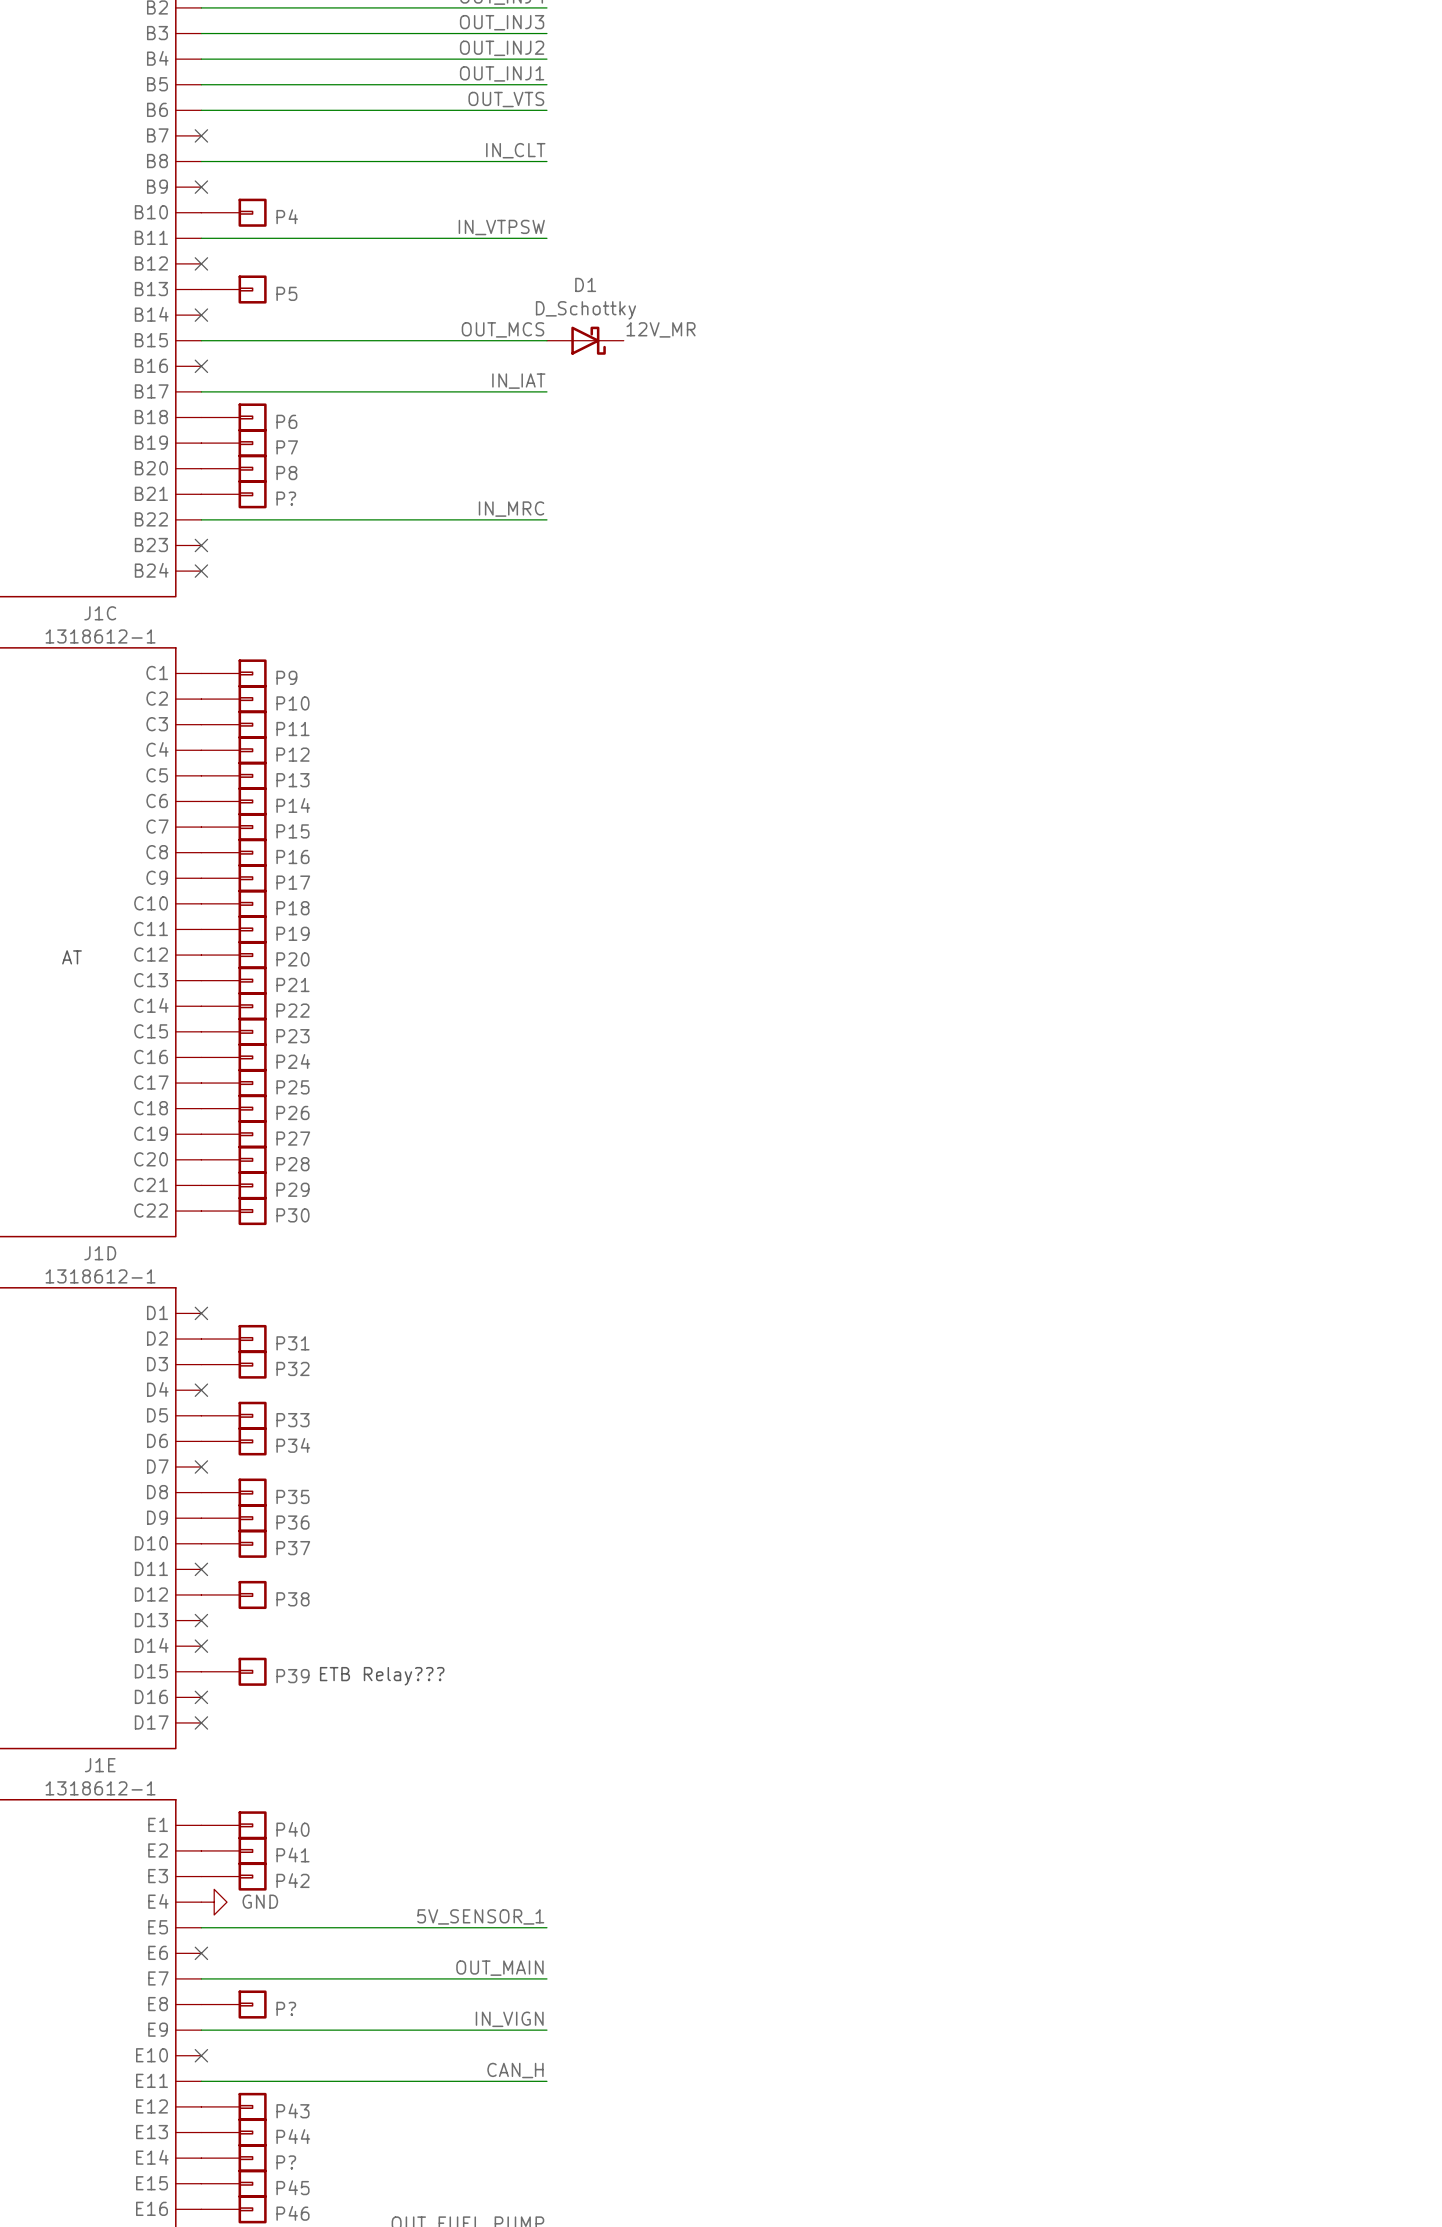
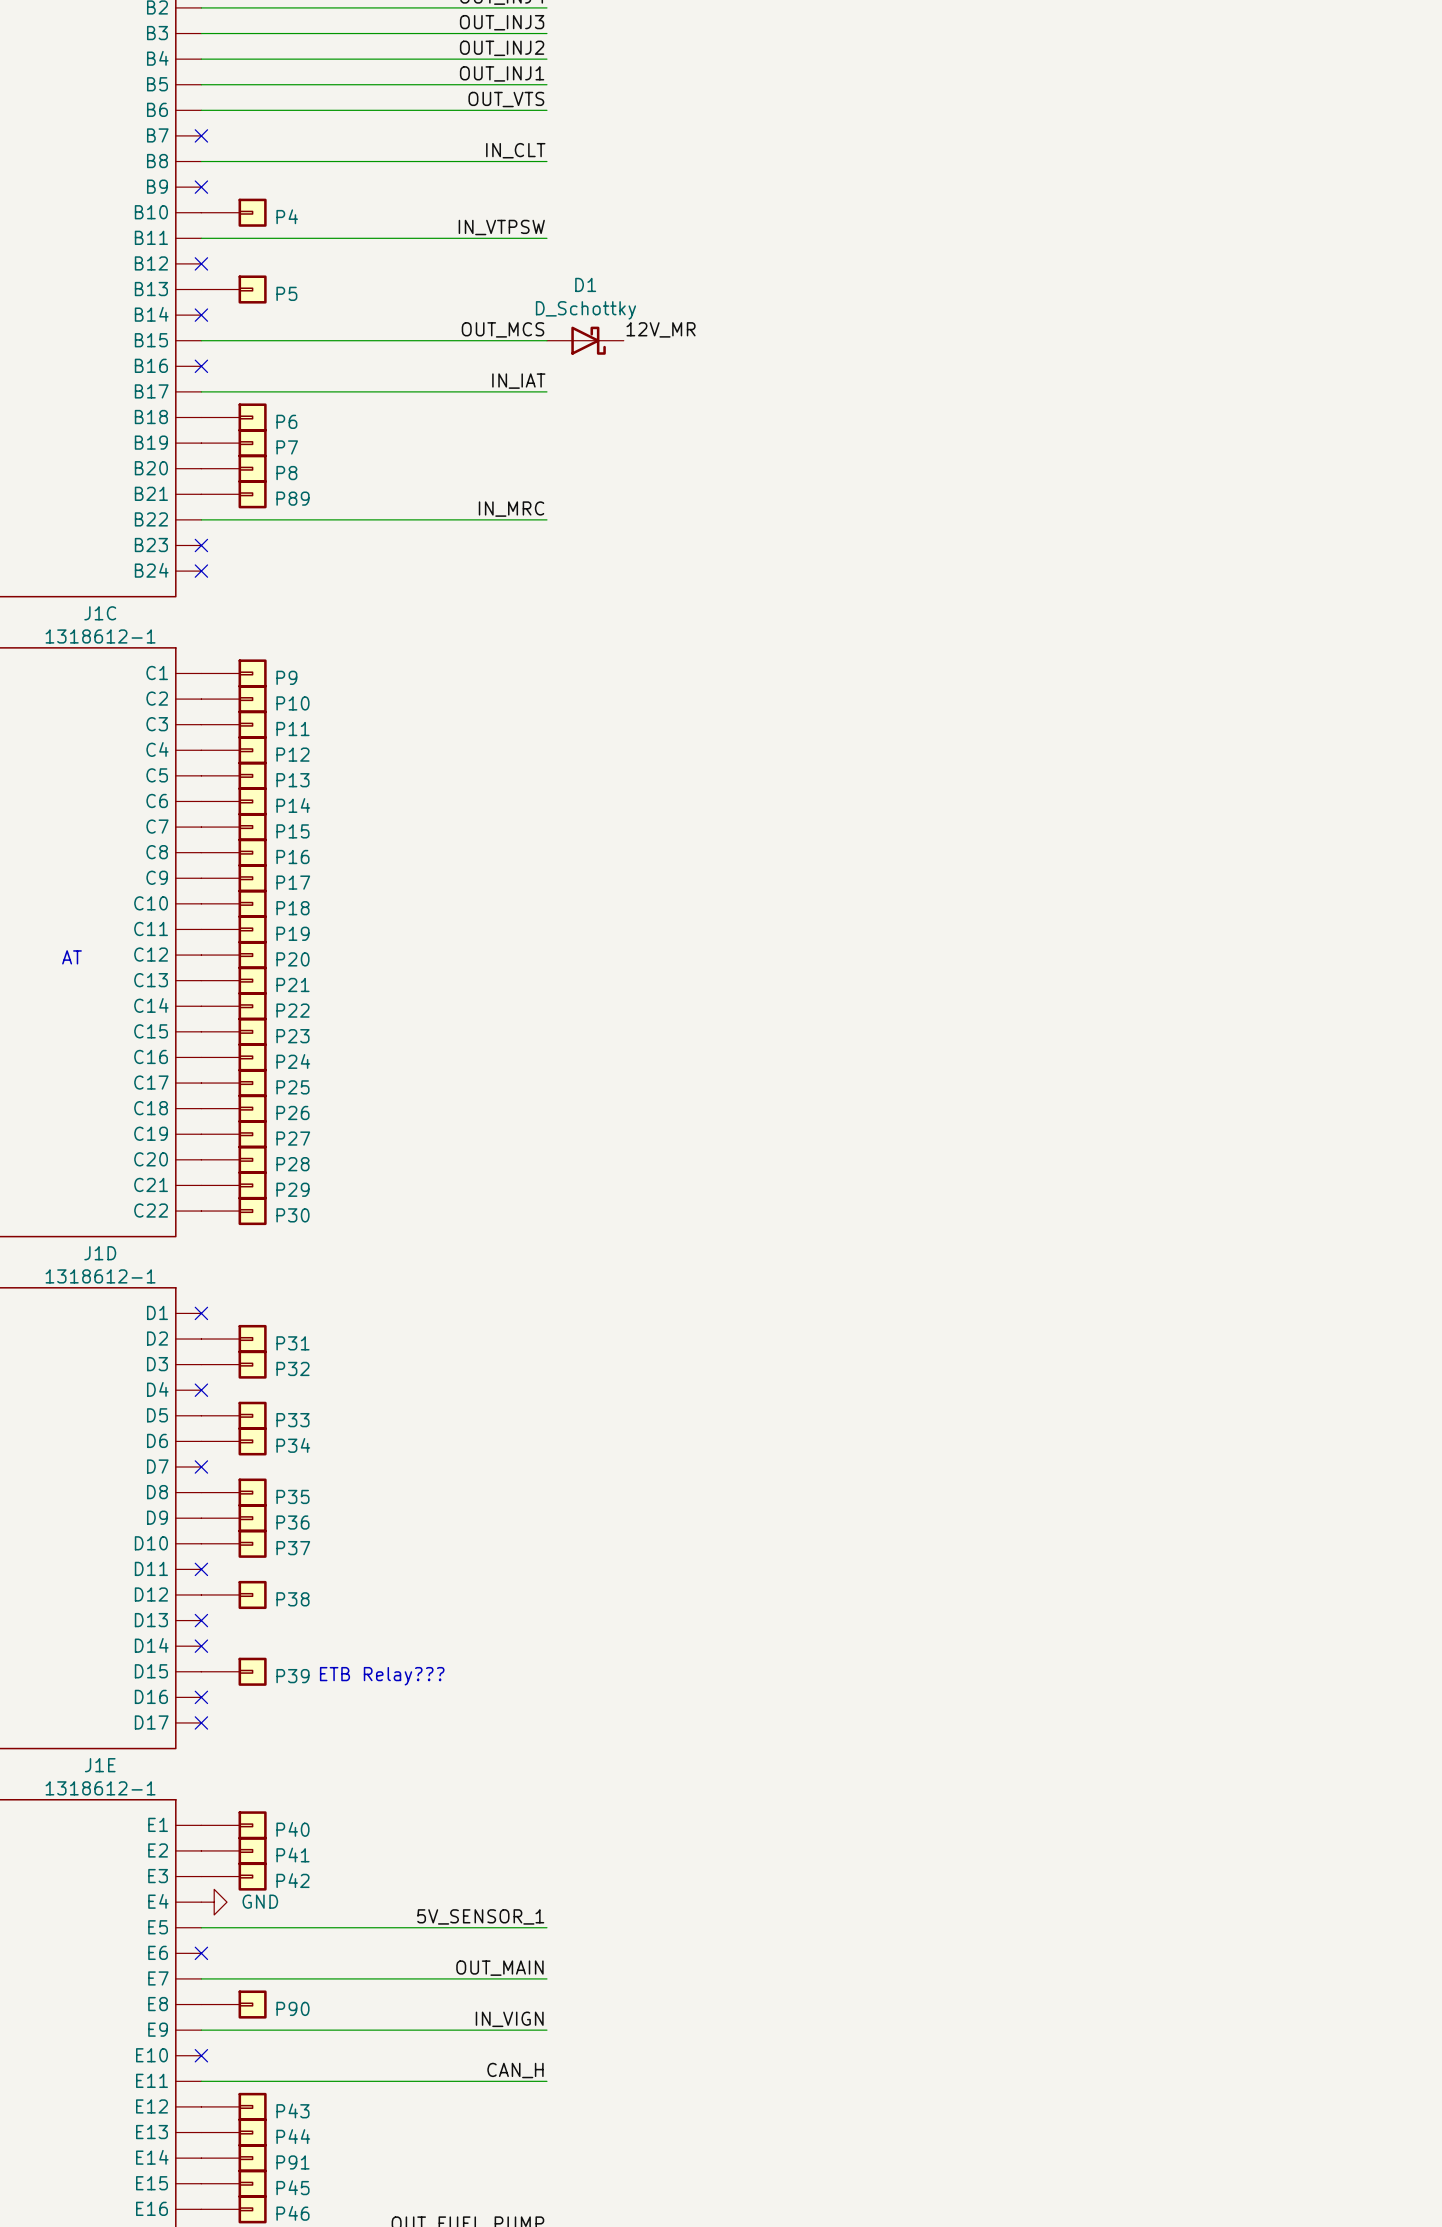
P? name: P? (286, 498) -> P89 (292, 498)
P? name: P? (286, 2008) -> P90 (292, 2008)
P? name: P? (286, 2162) -> P91 (292, 2162)

